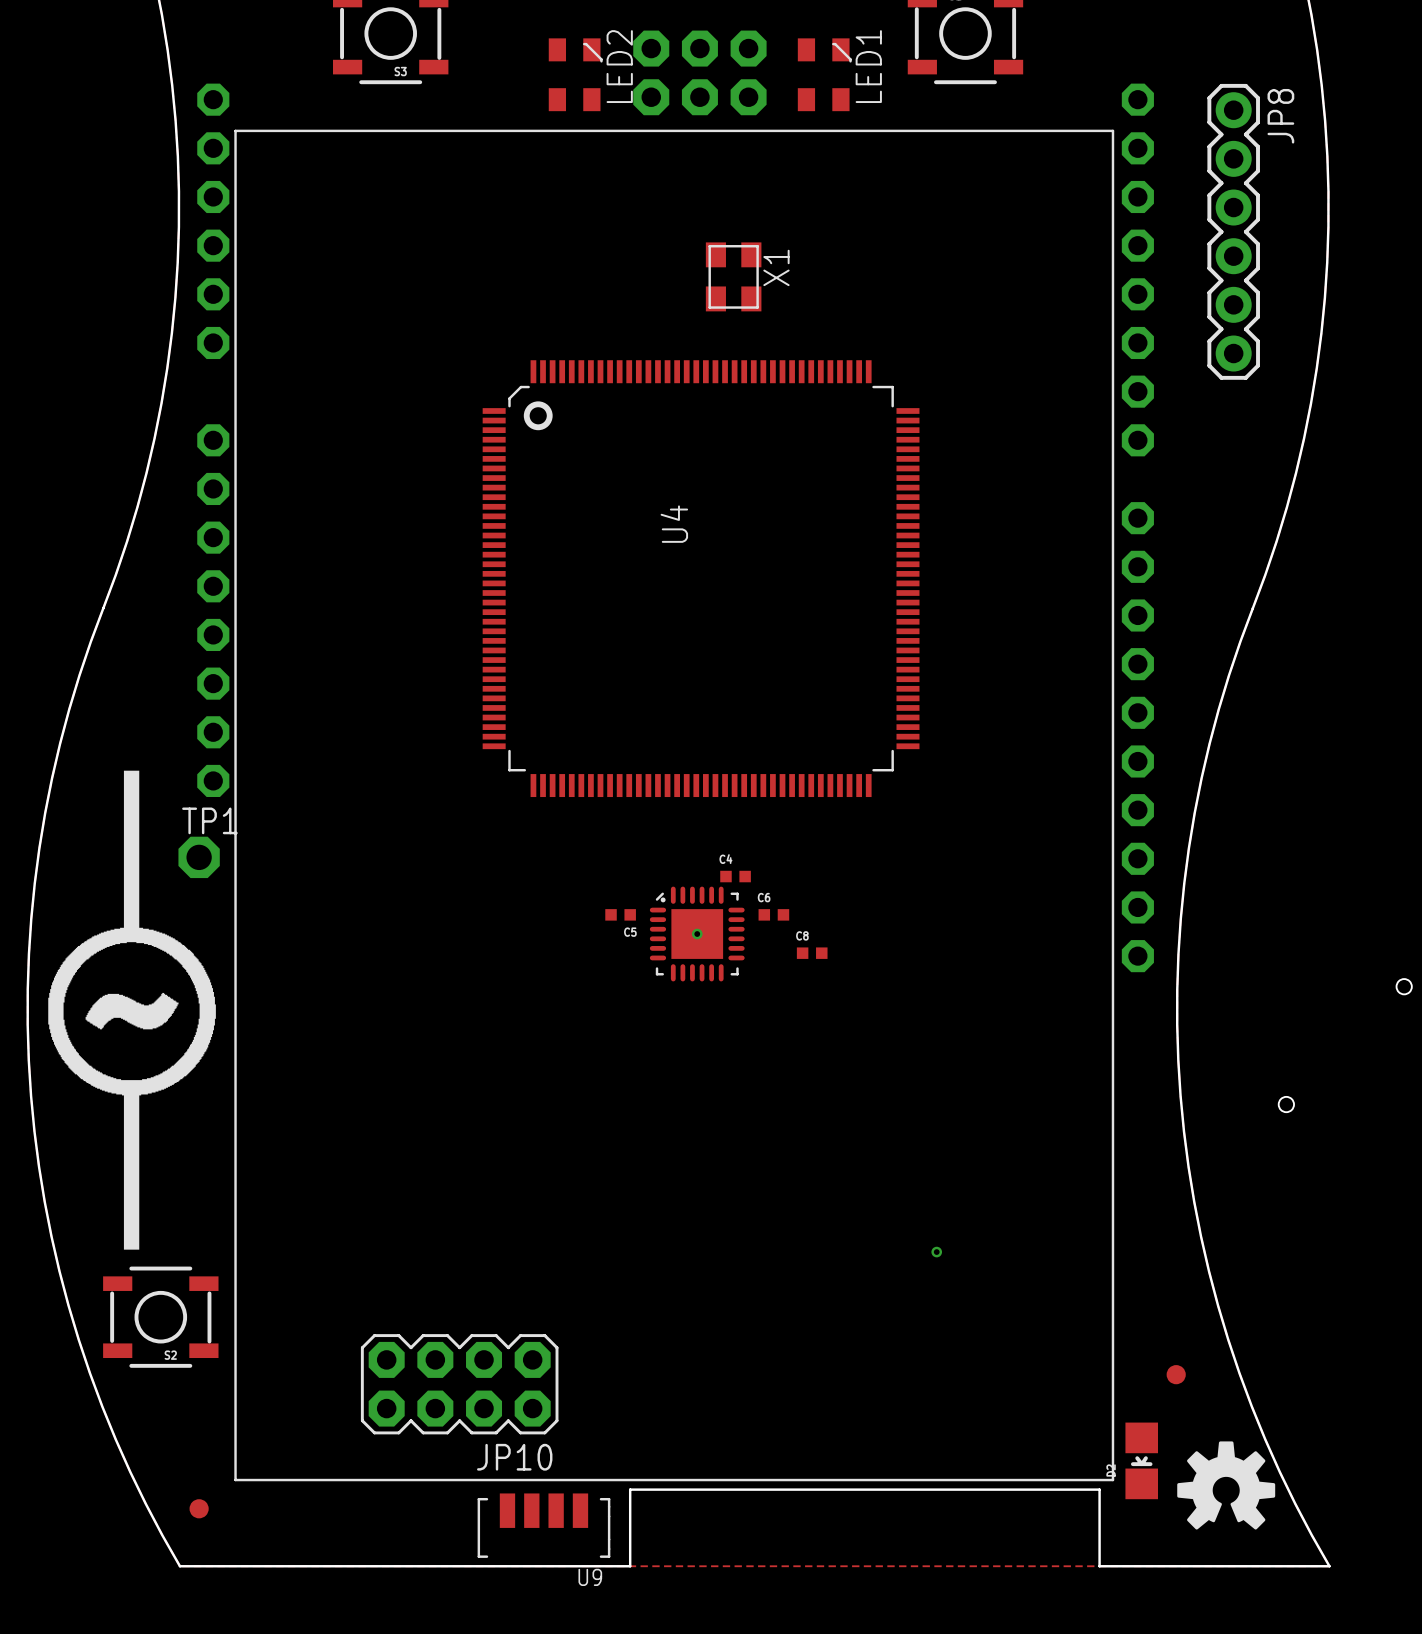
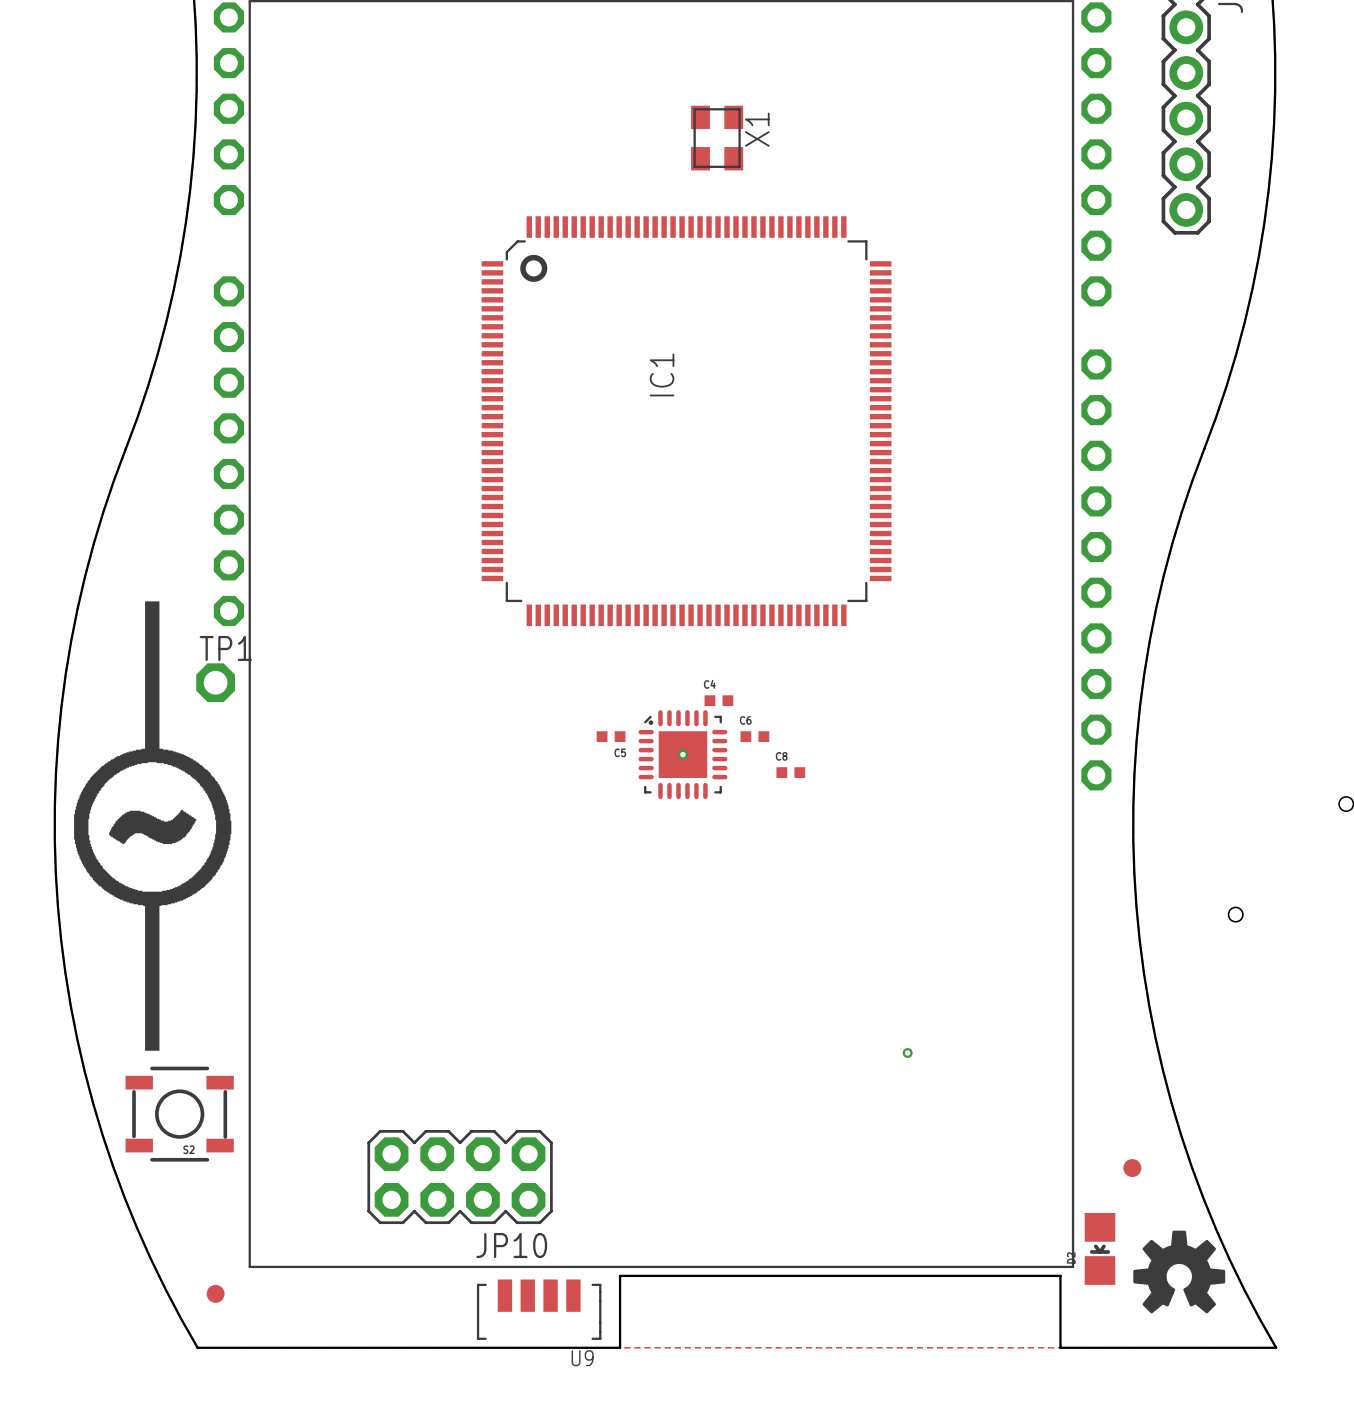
U4 name: U4 (674, 524) -> IC1 (662, 374)

